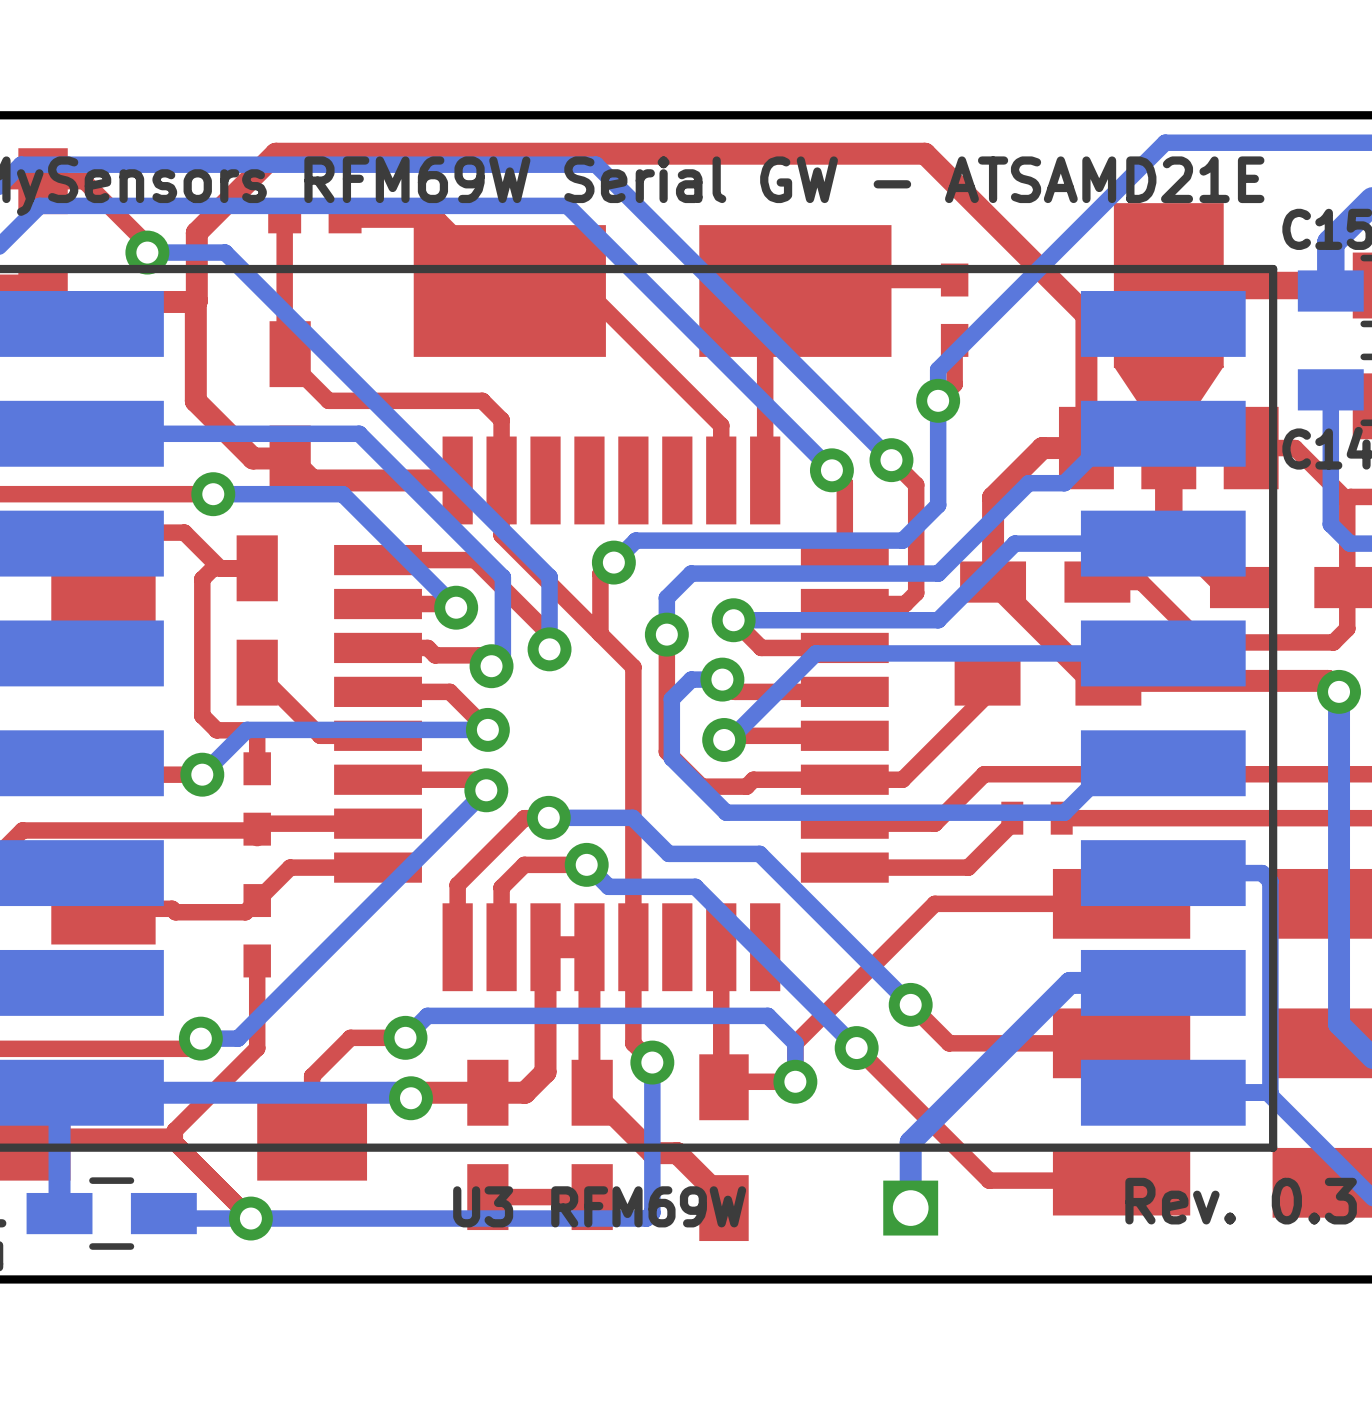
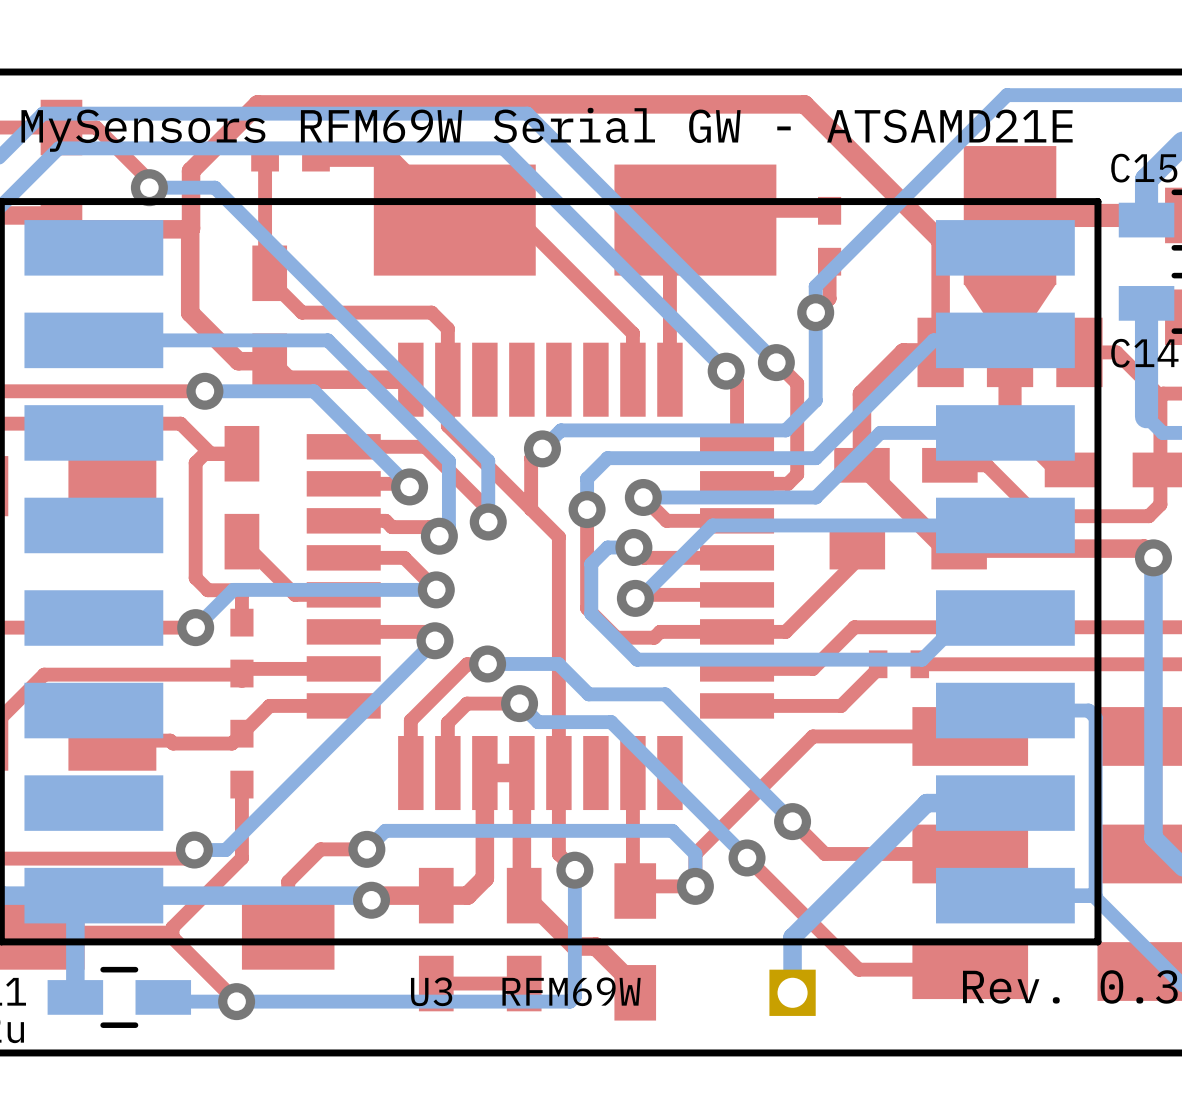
bottom track width: thin (1330, 389) (1330, 524) -> thick (1146, 303) (1146, 416)
bottom track: (1113, 433) (1064, 483) (1028, 483) -> (963, 340) (933, 340) (891, 382)

